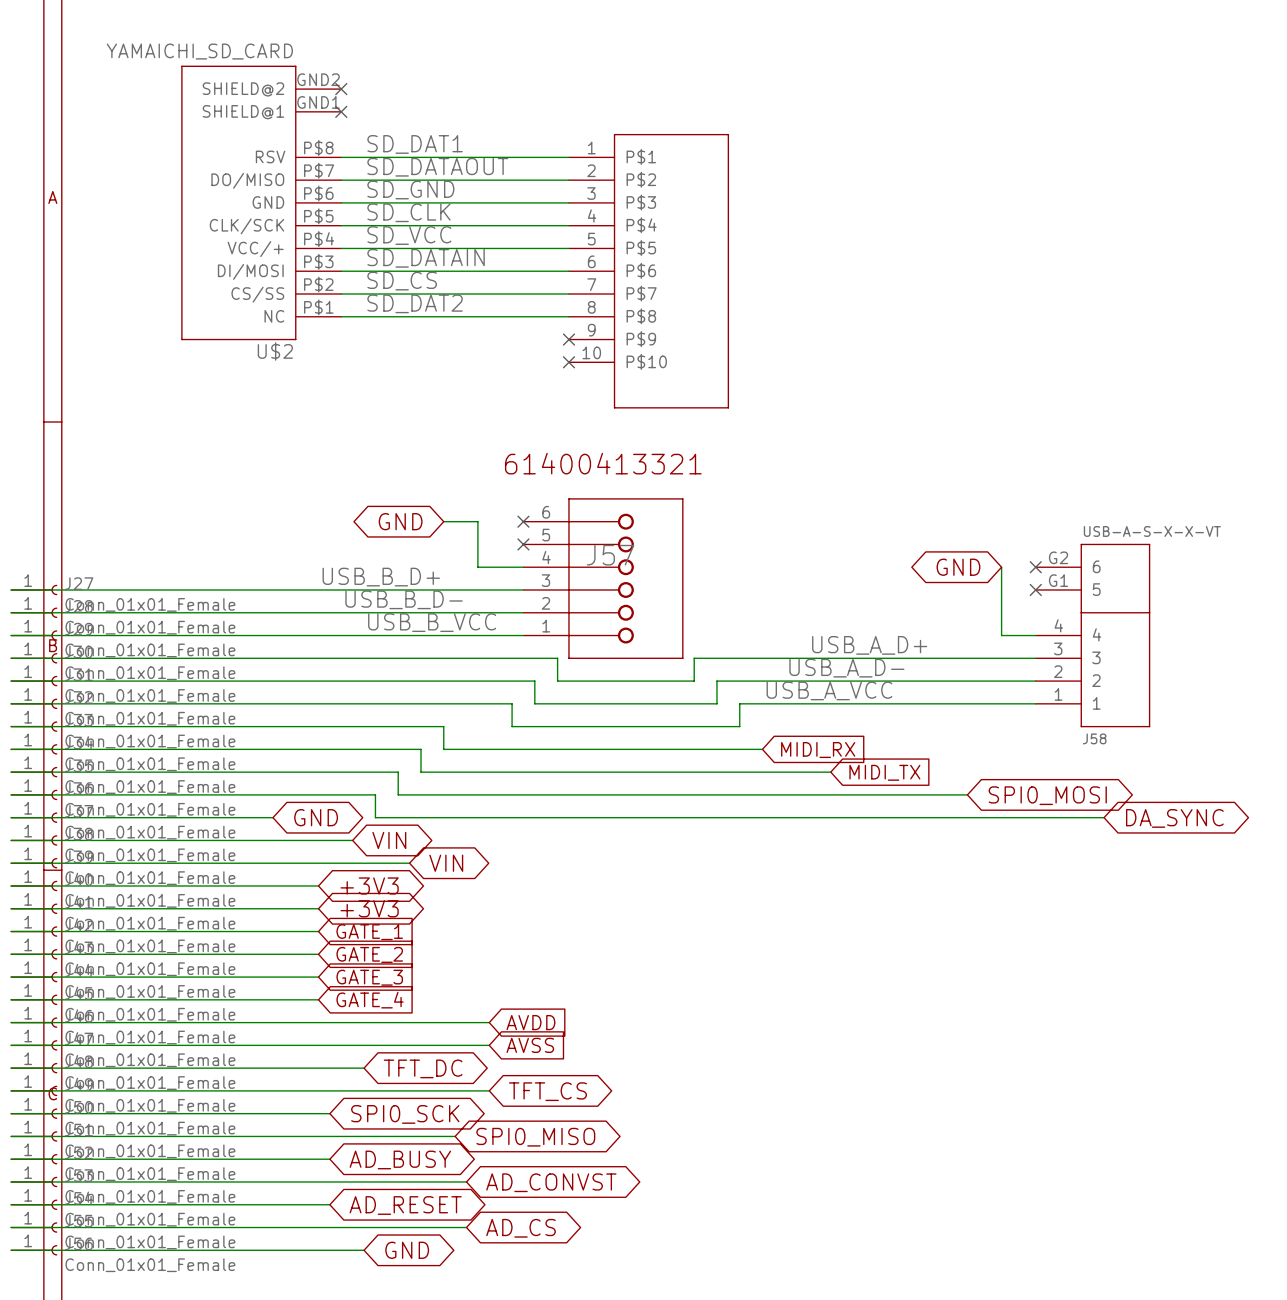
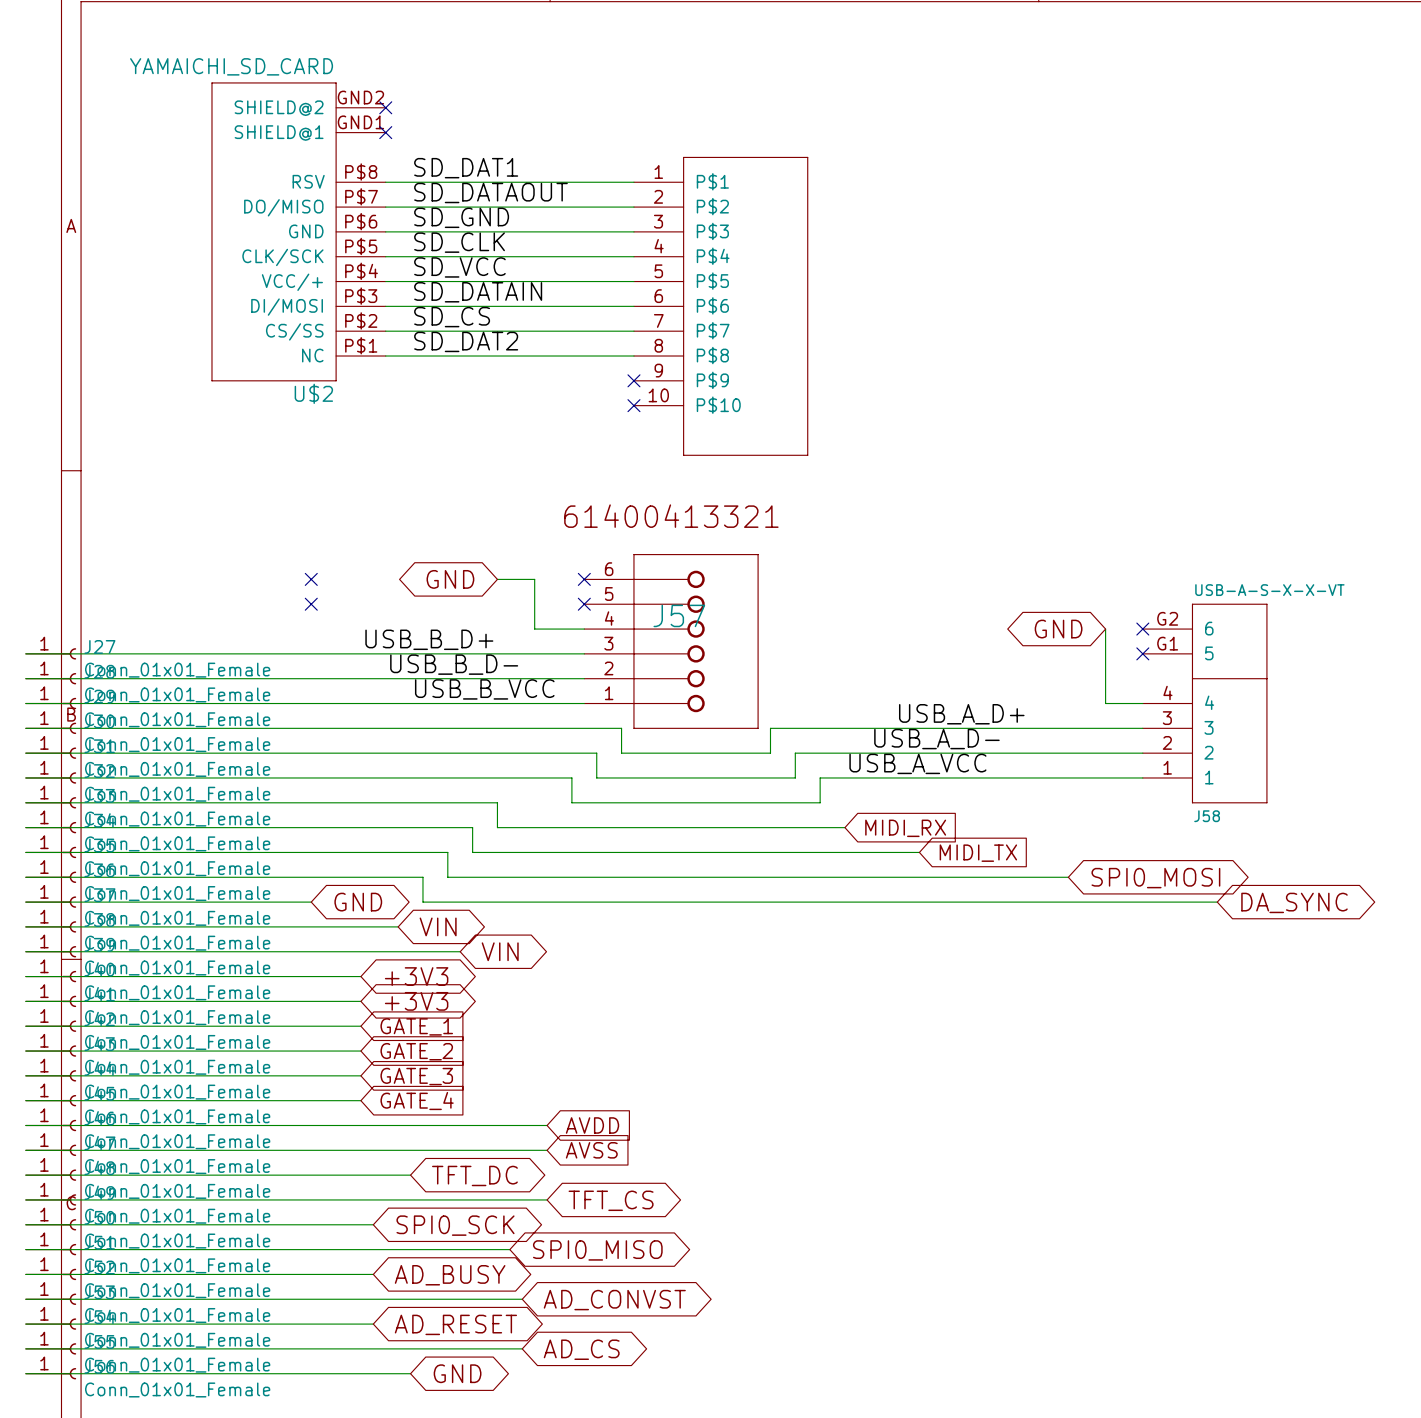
no-connect mark: none -> (311, 579)
no-connect mark: none -> (311, 604)

